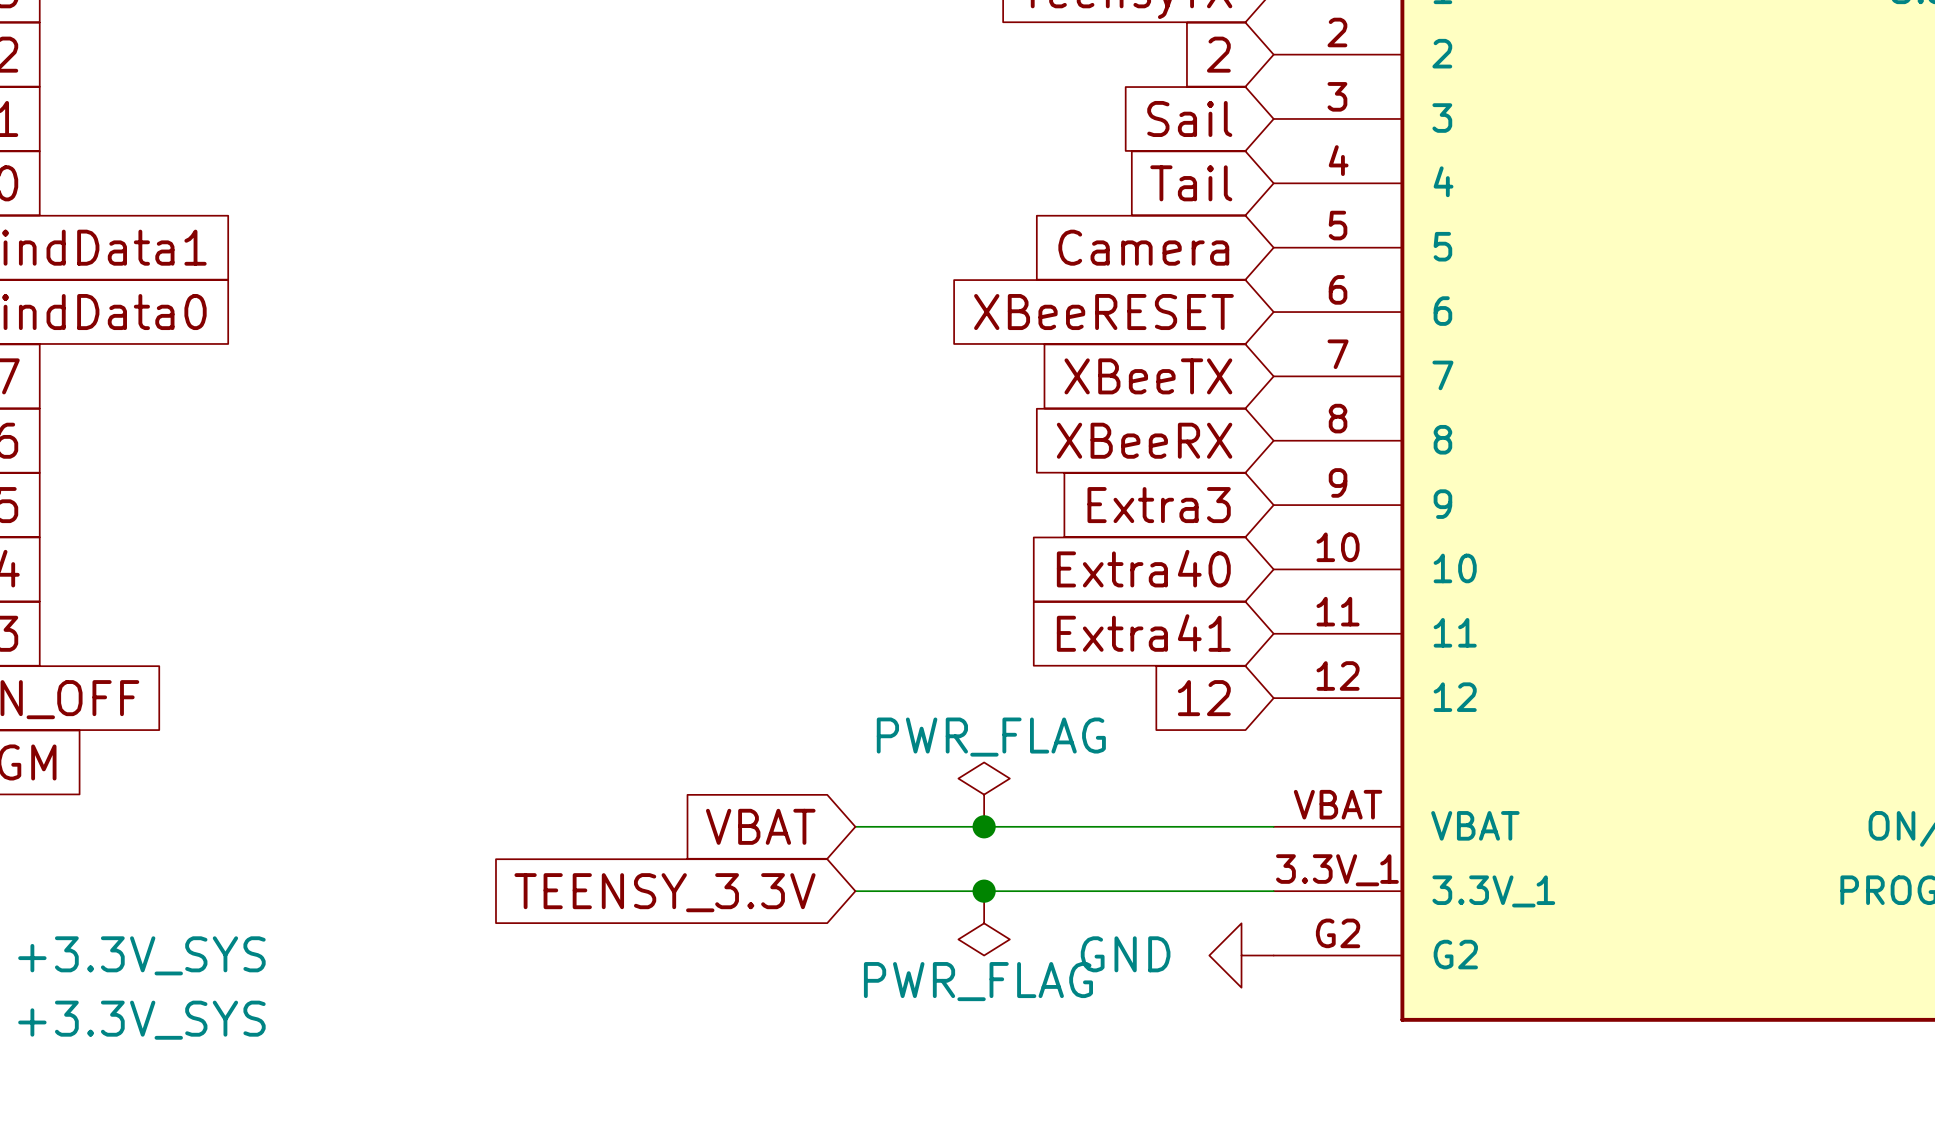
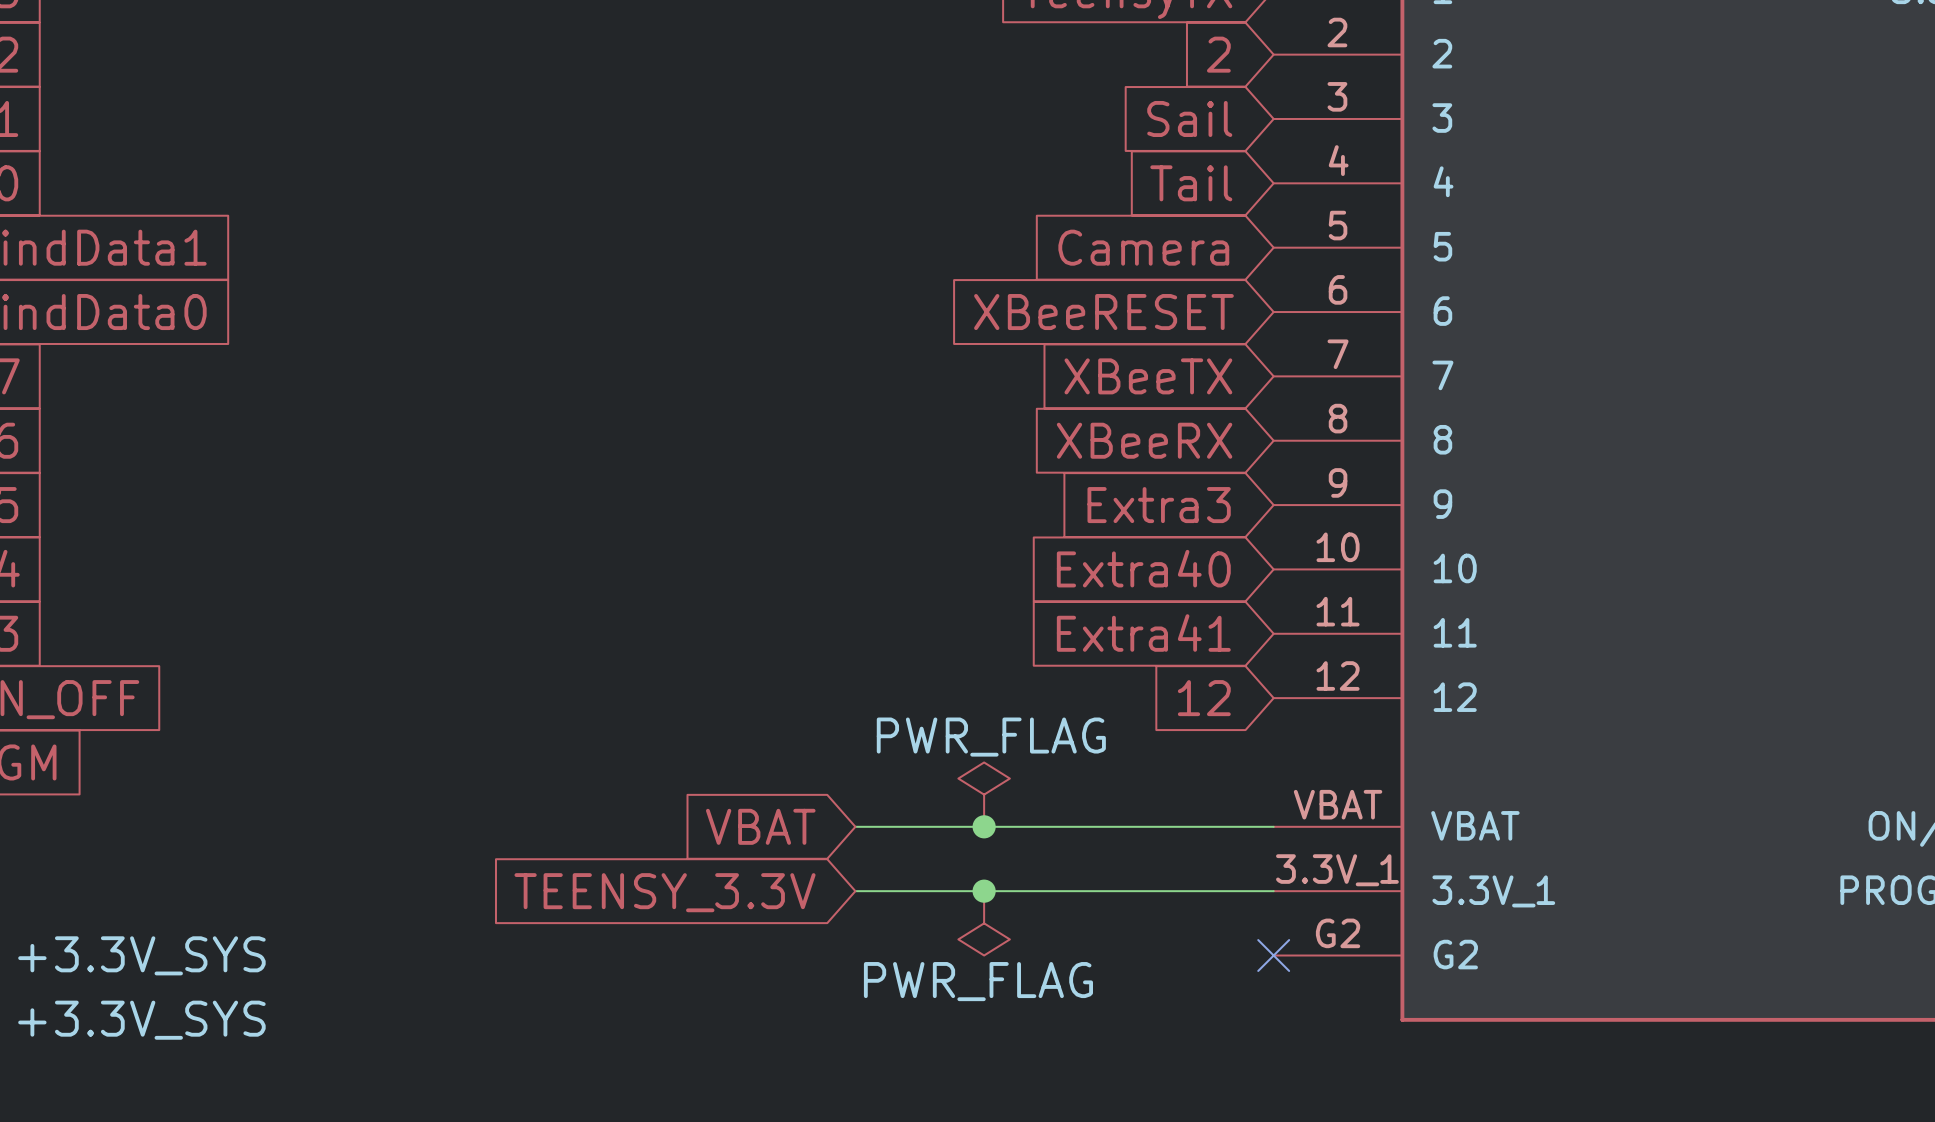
power symbol: GND (1241, 955) -> none
no-connect mark: none -> (1273, 955)

